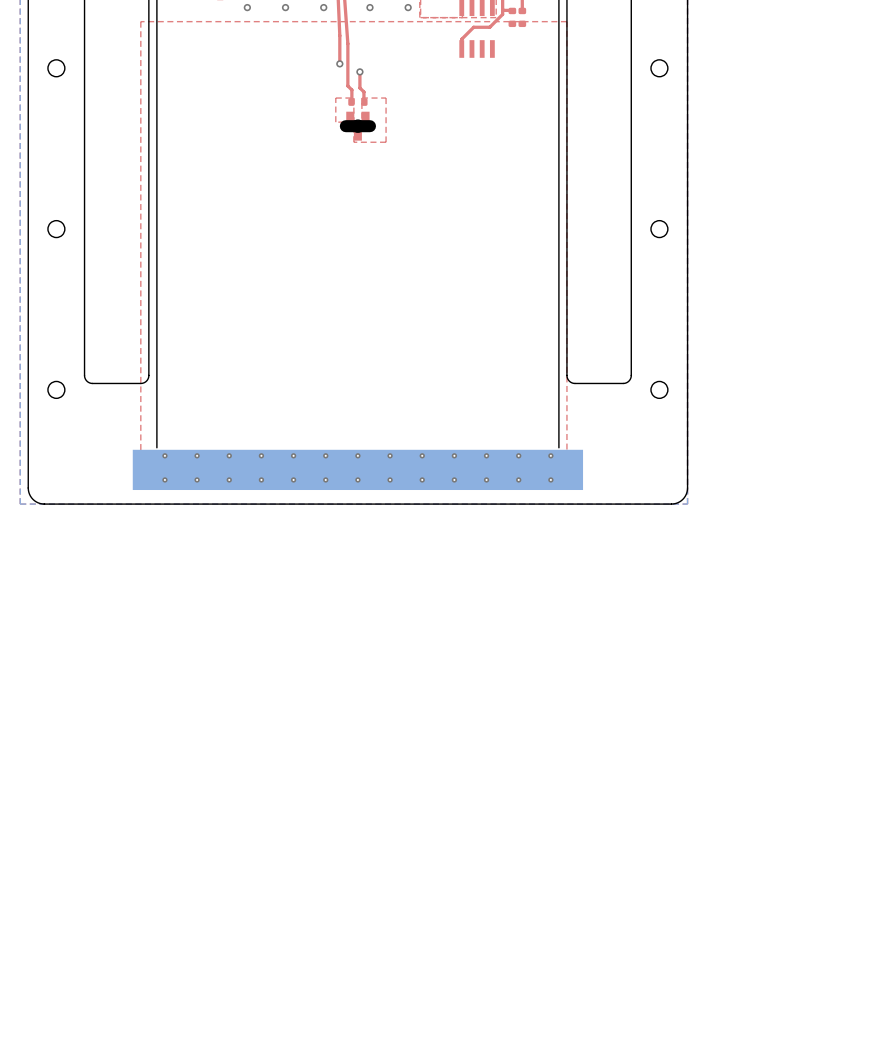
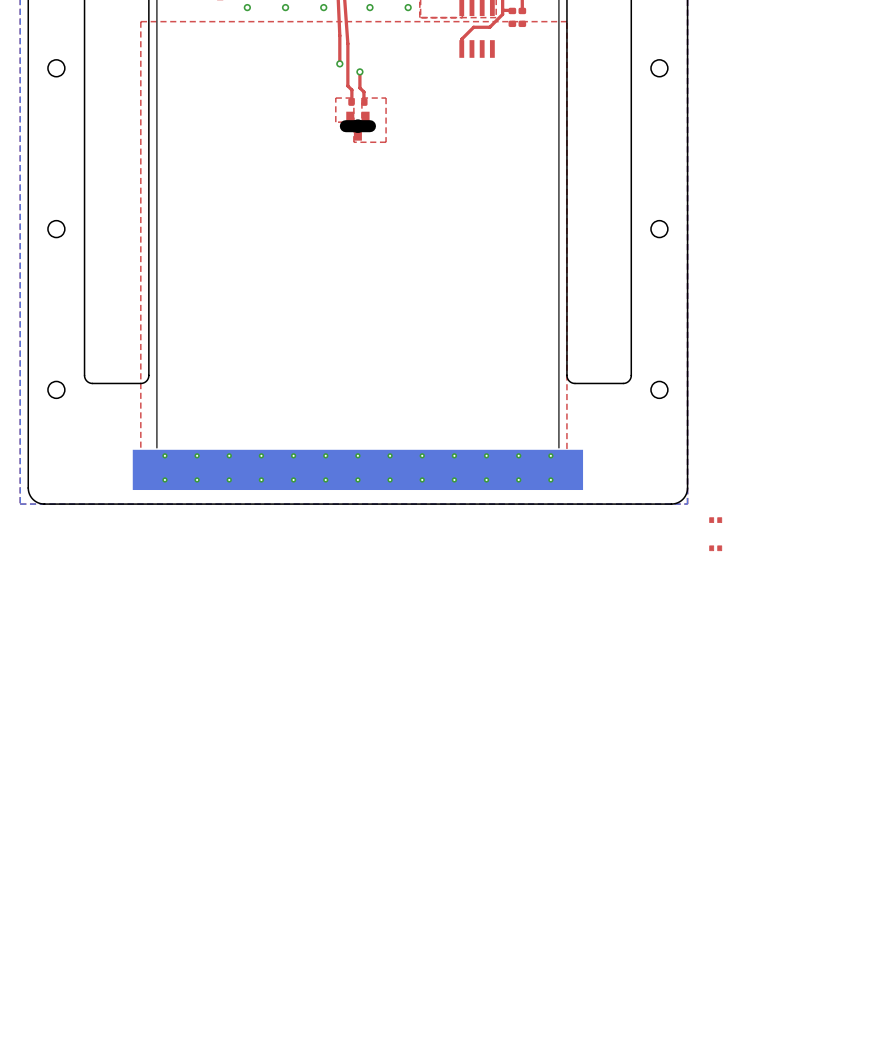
part: none -> (715, 520)
part: none -> (715, 548)

